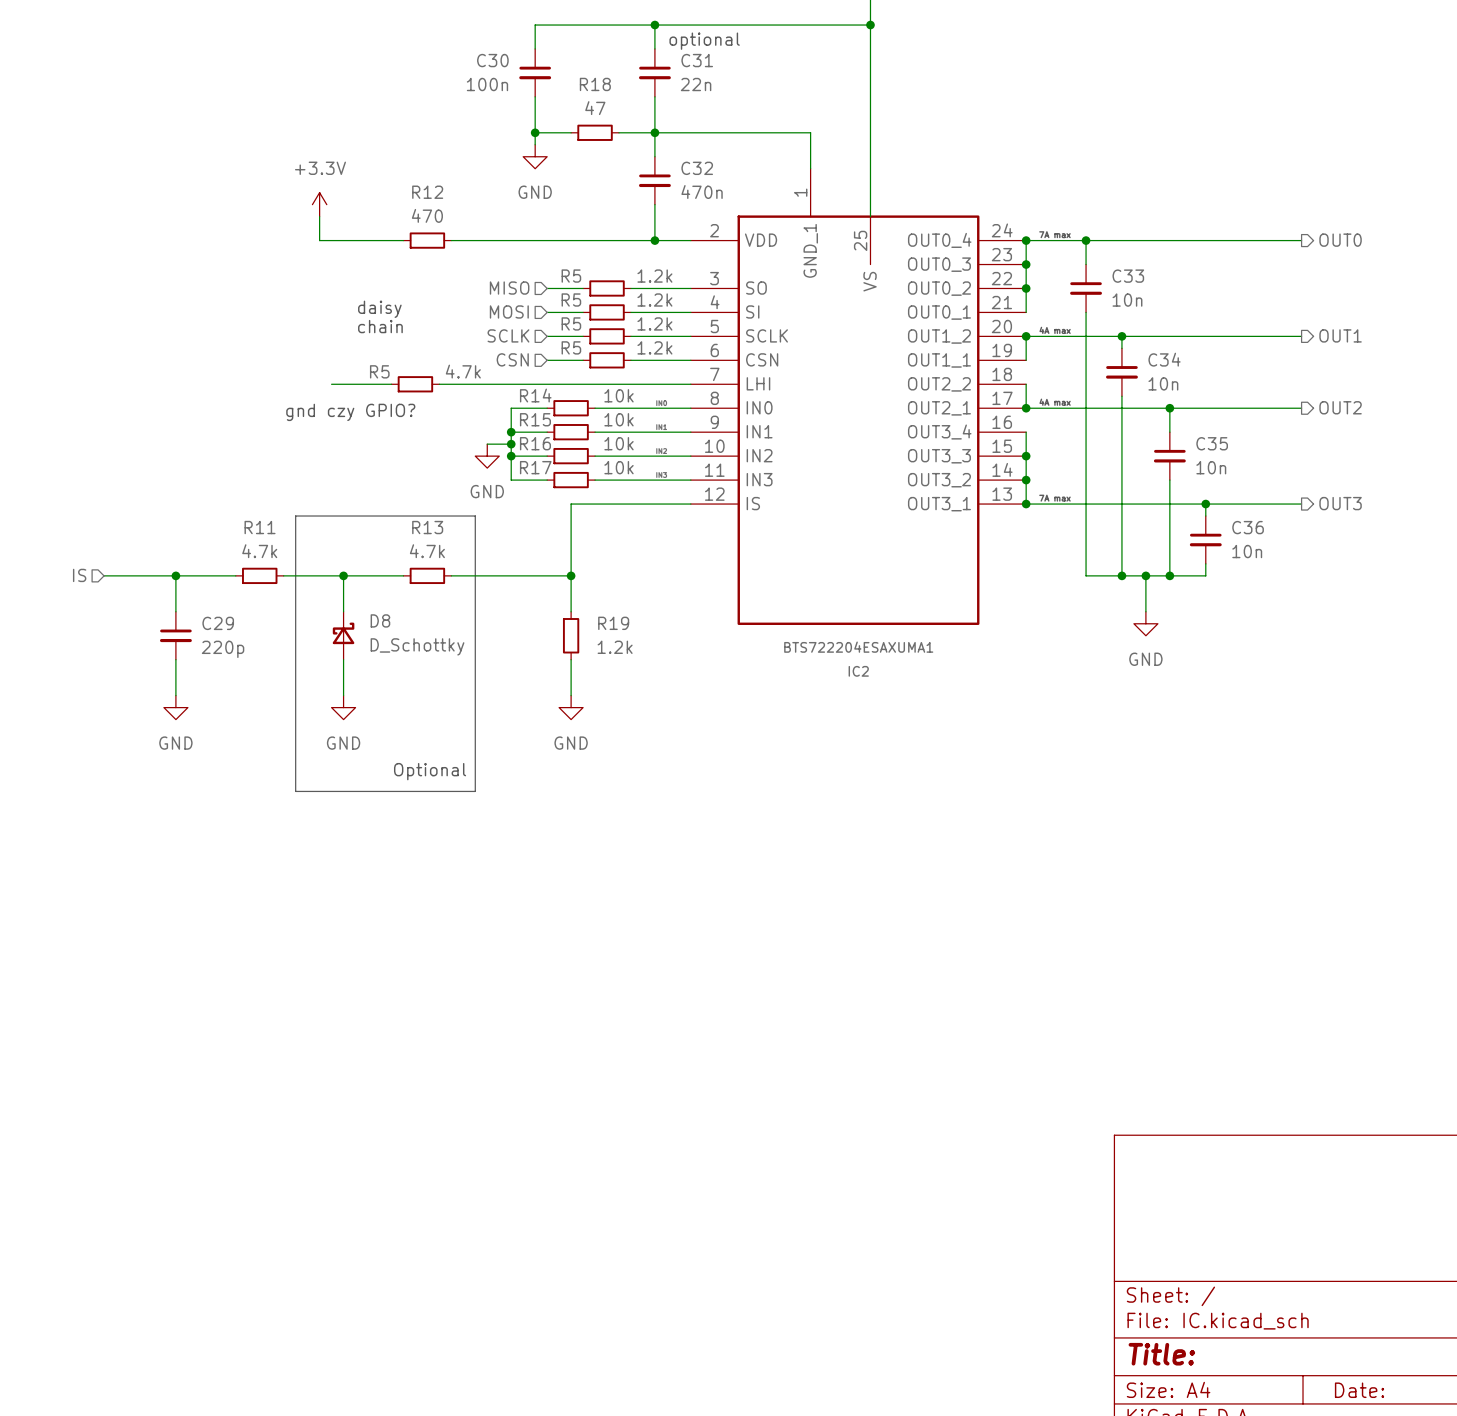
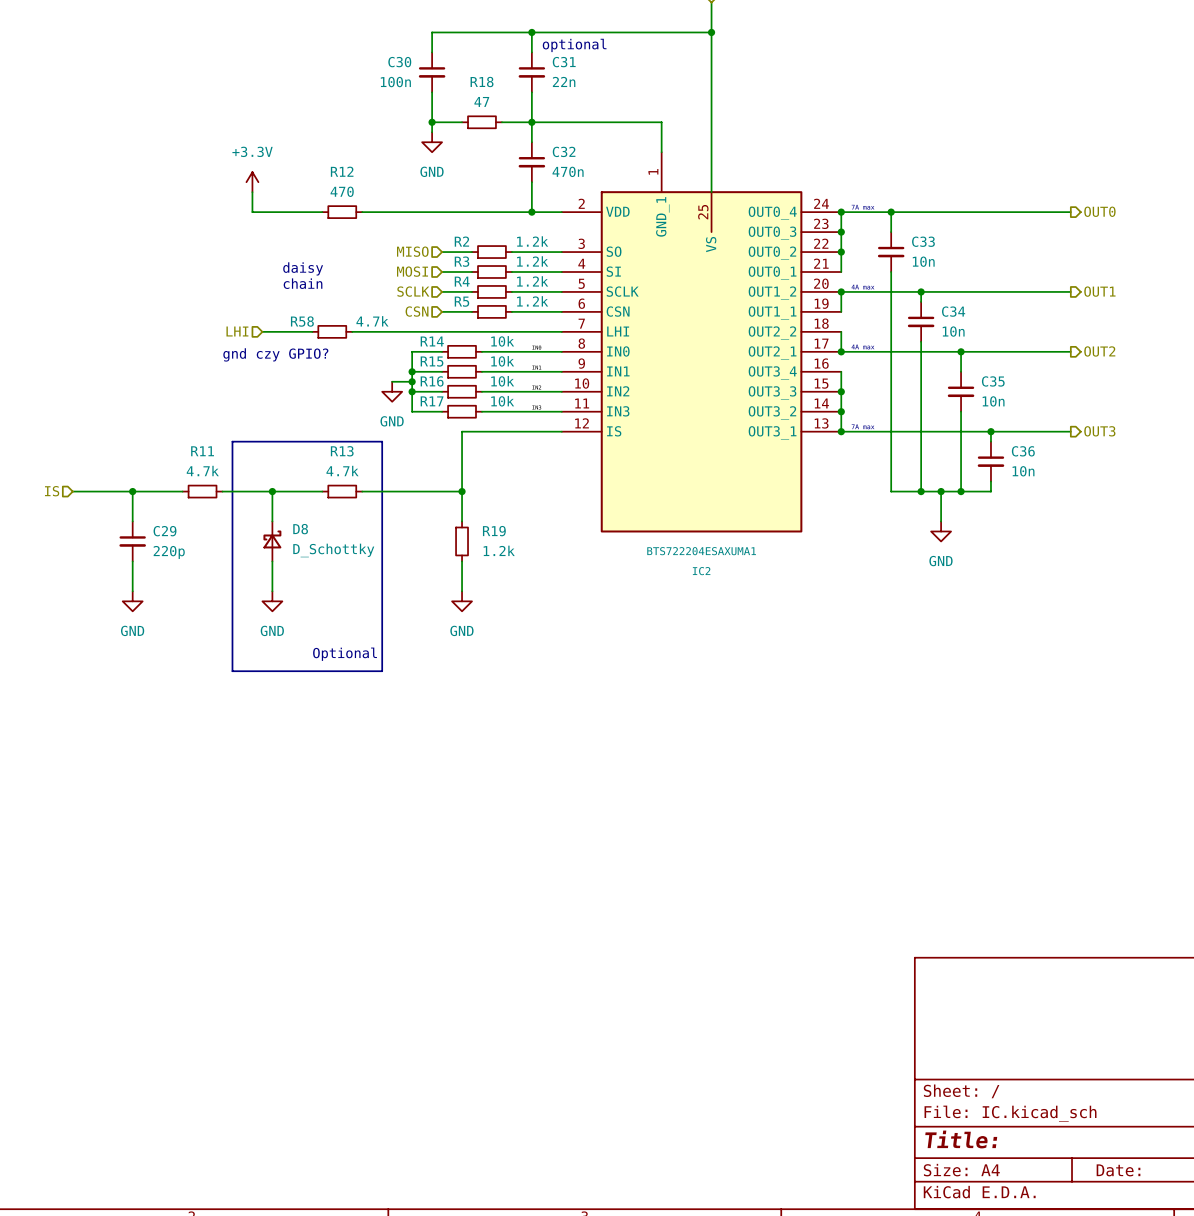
R5 name: R5 (571, 276) -> R2 (461, 241)
R5 name: R5 (571, 300) -> R3 (461, 261)
R5 name: R5 (571, 323) -> R4 (462, 281)
R5 name: R5 (379, 371) -> R58 (302, 321)
hierarchical label: none -> LHI (237, 331)

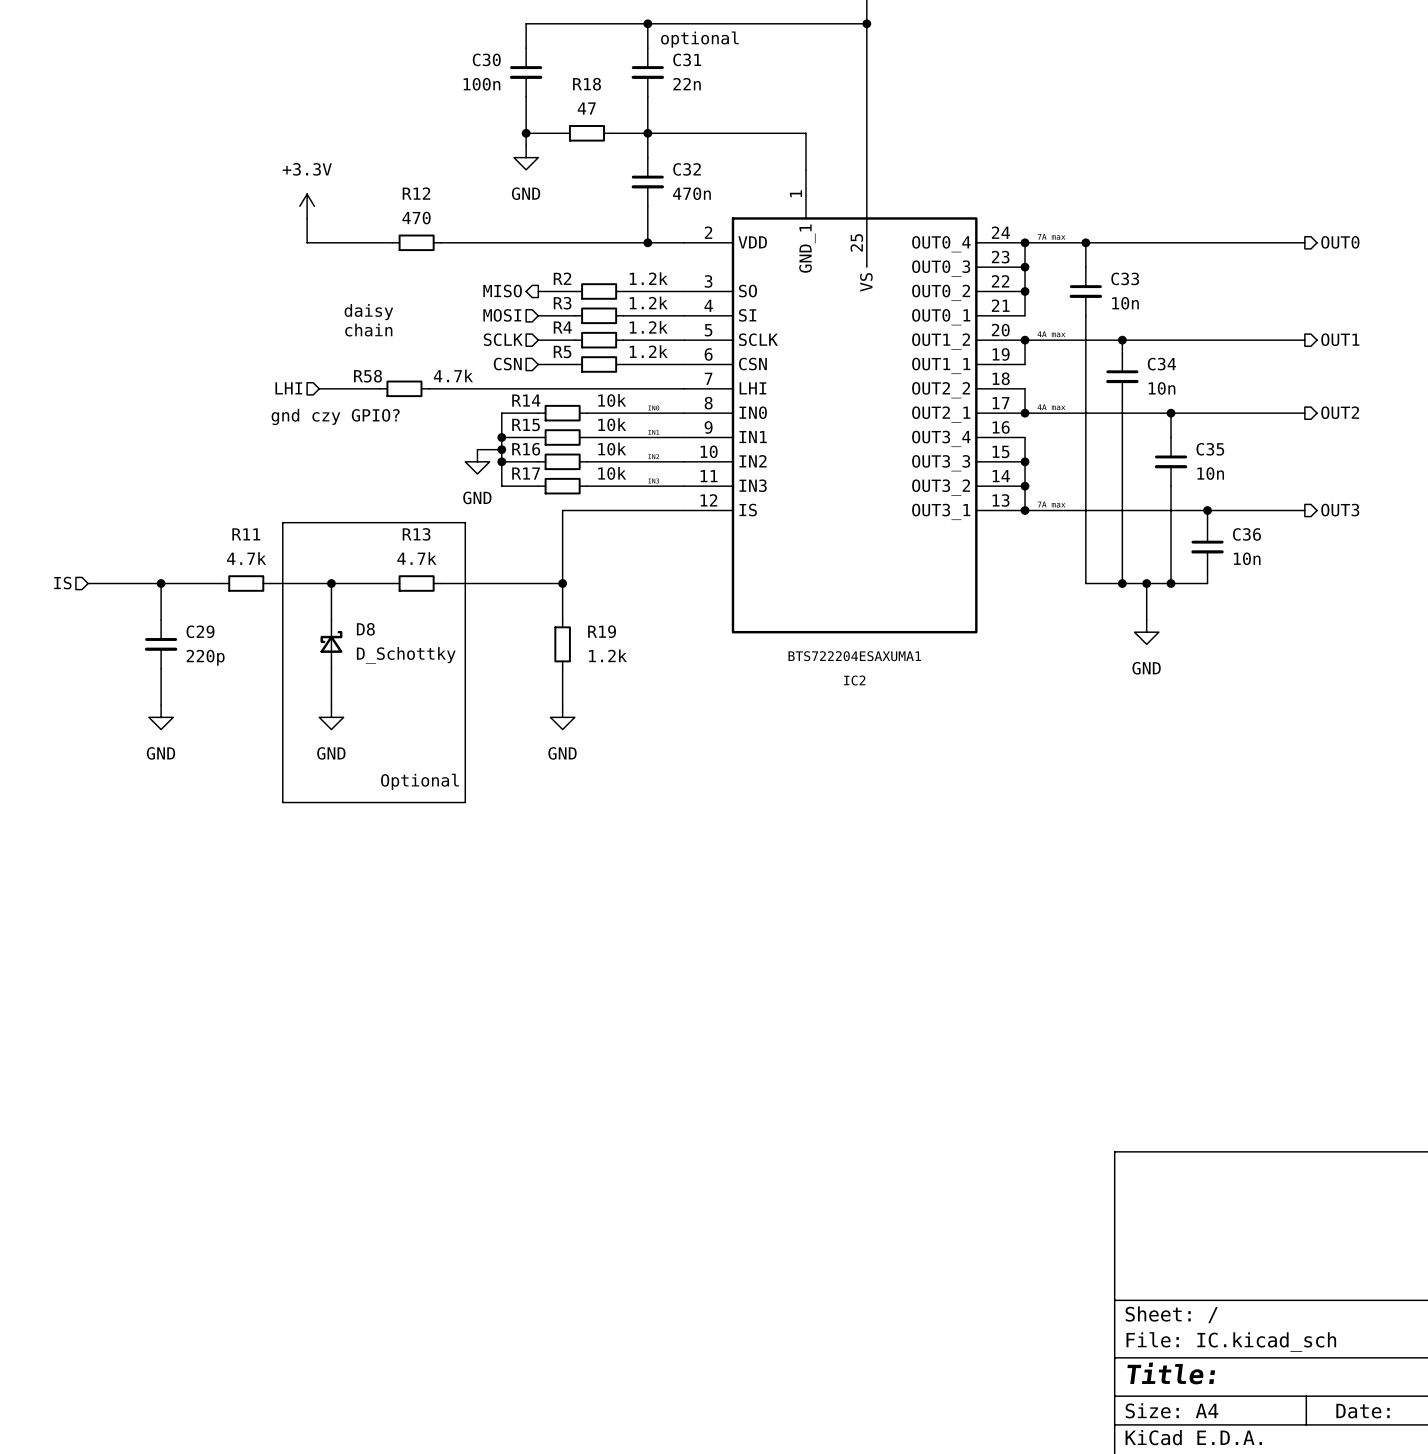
hierarchical label shape: input (412, 251) -> output (502, 291)

